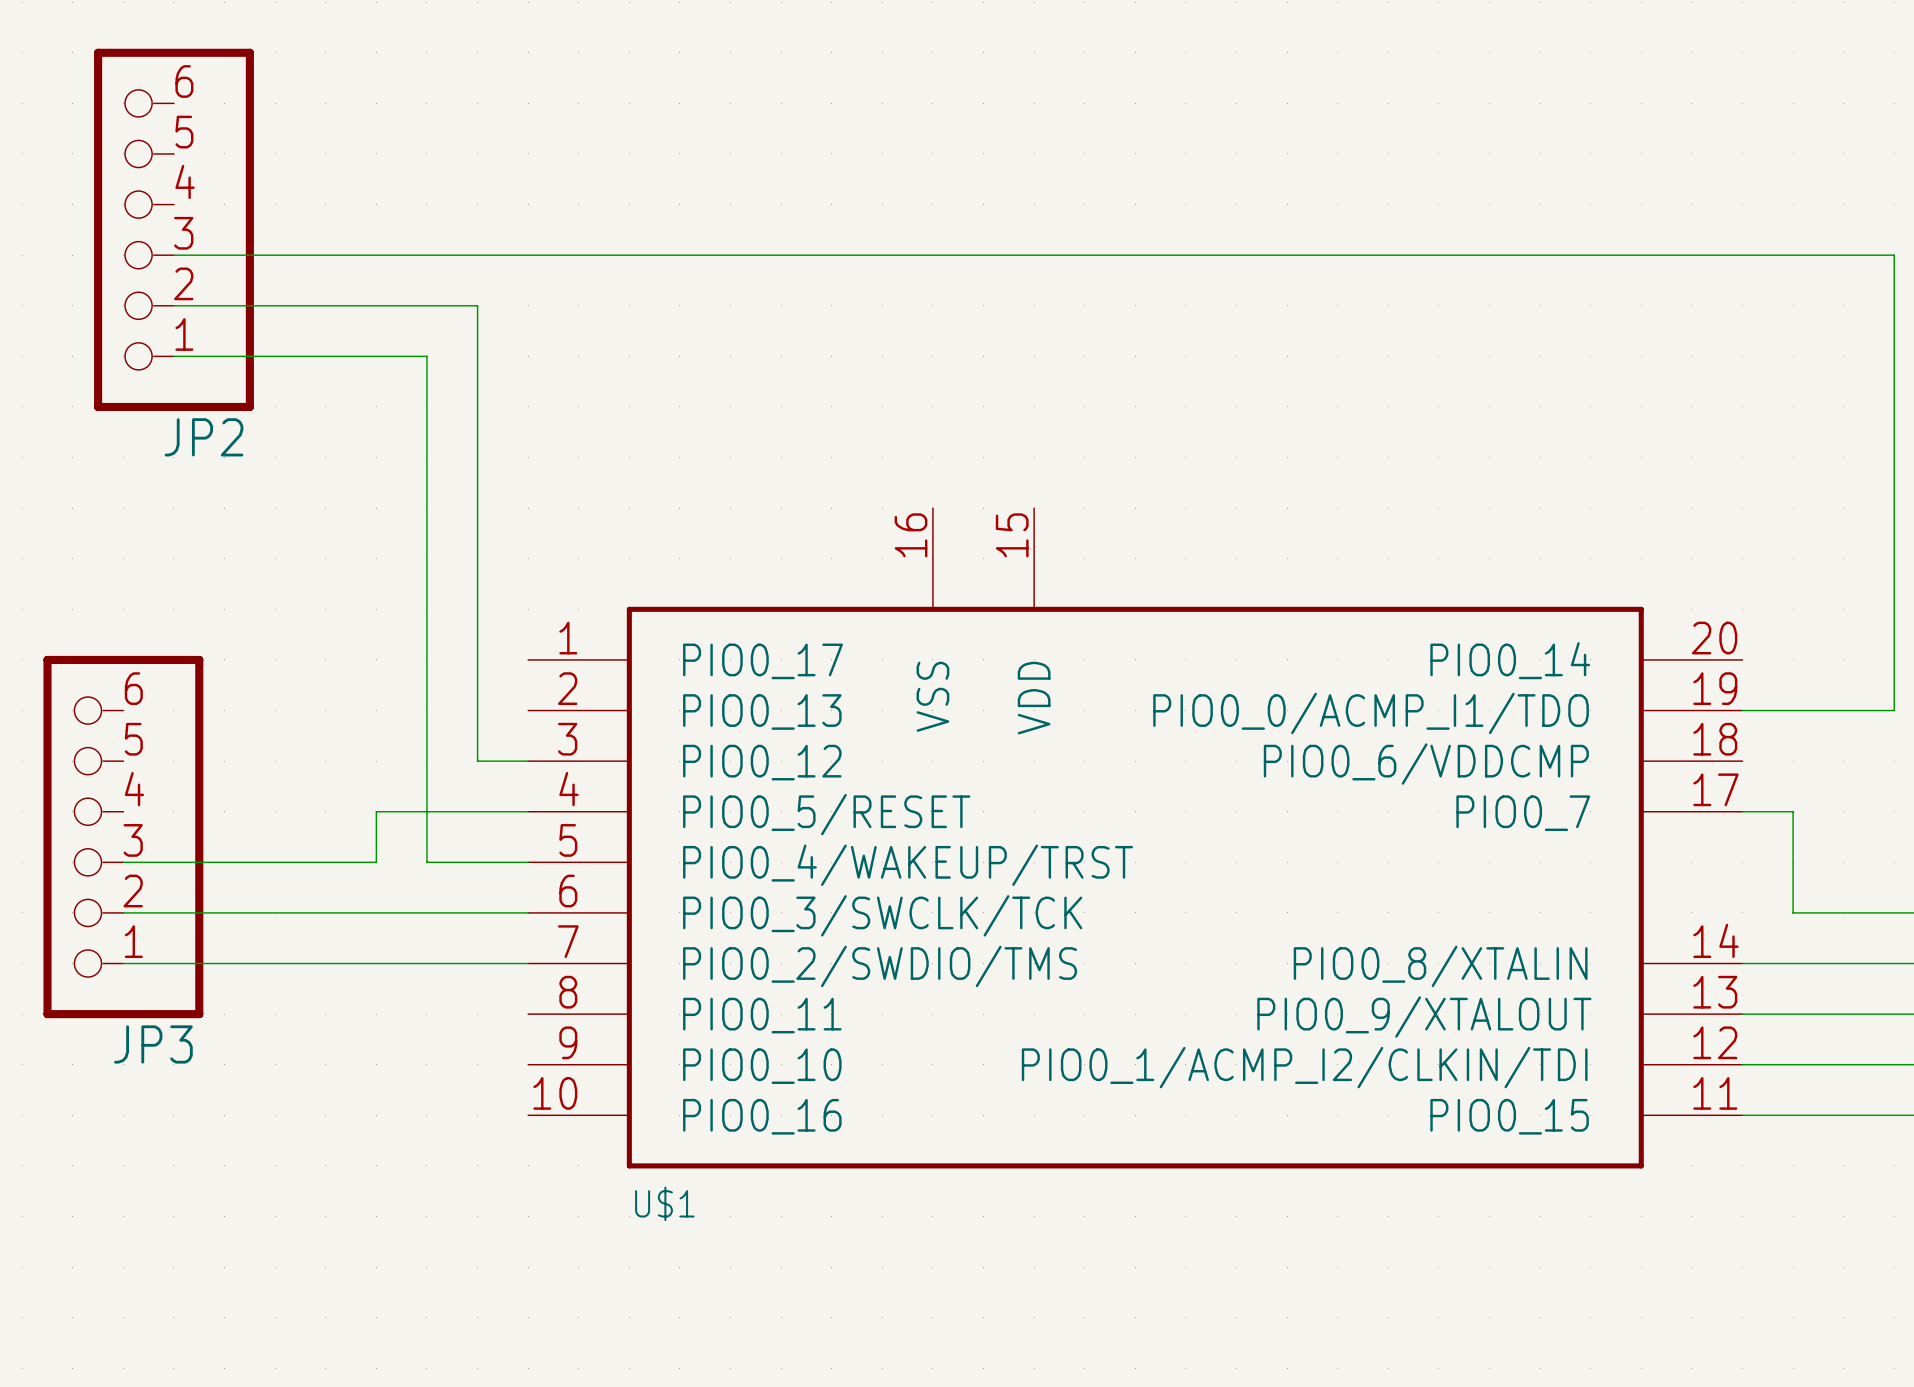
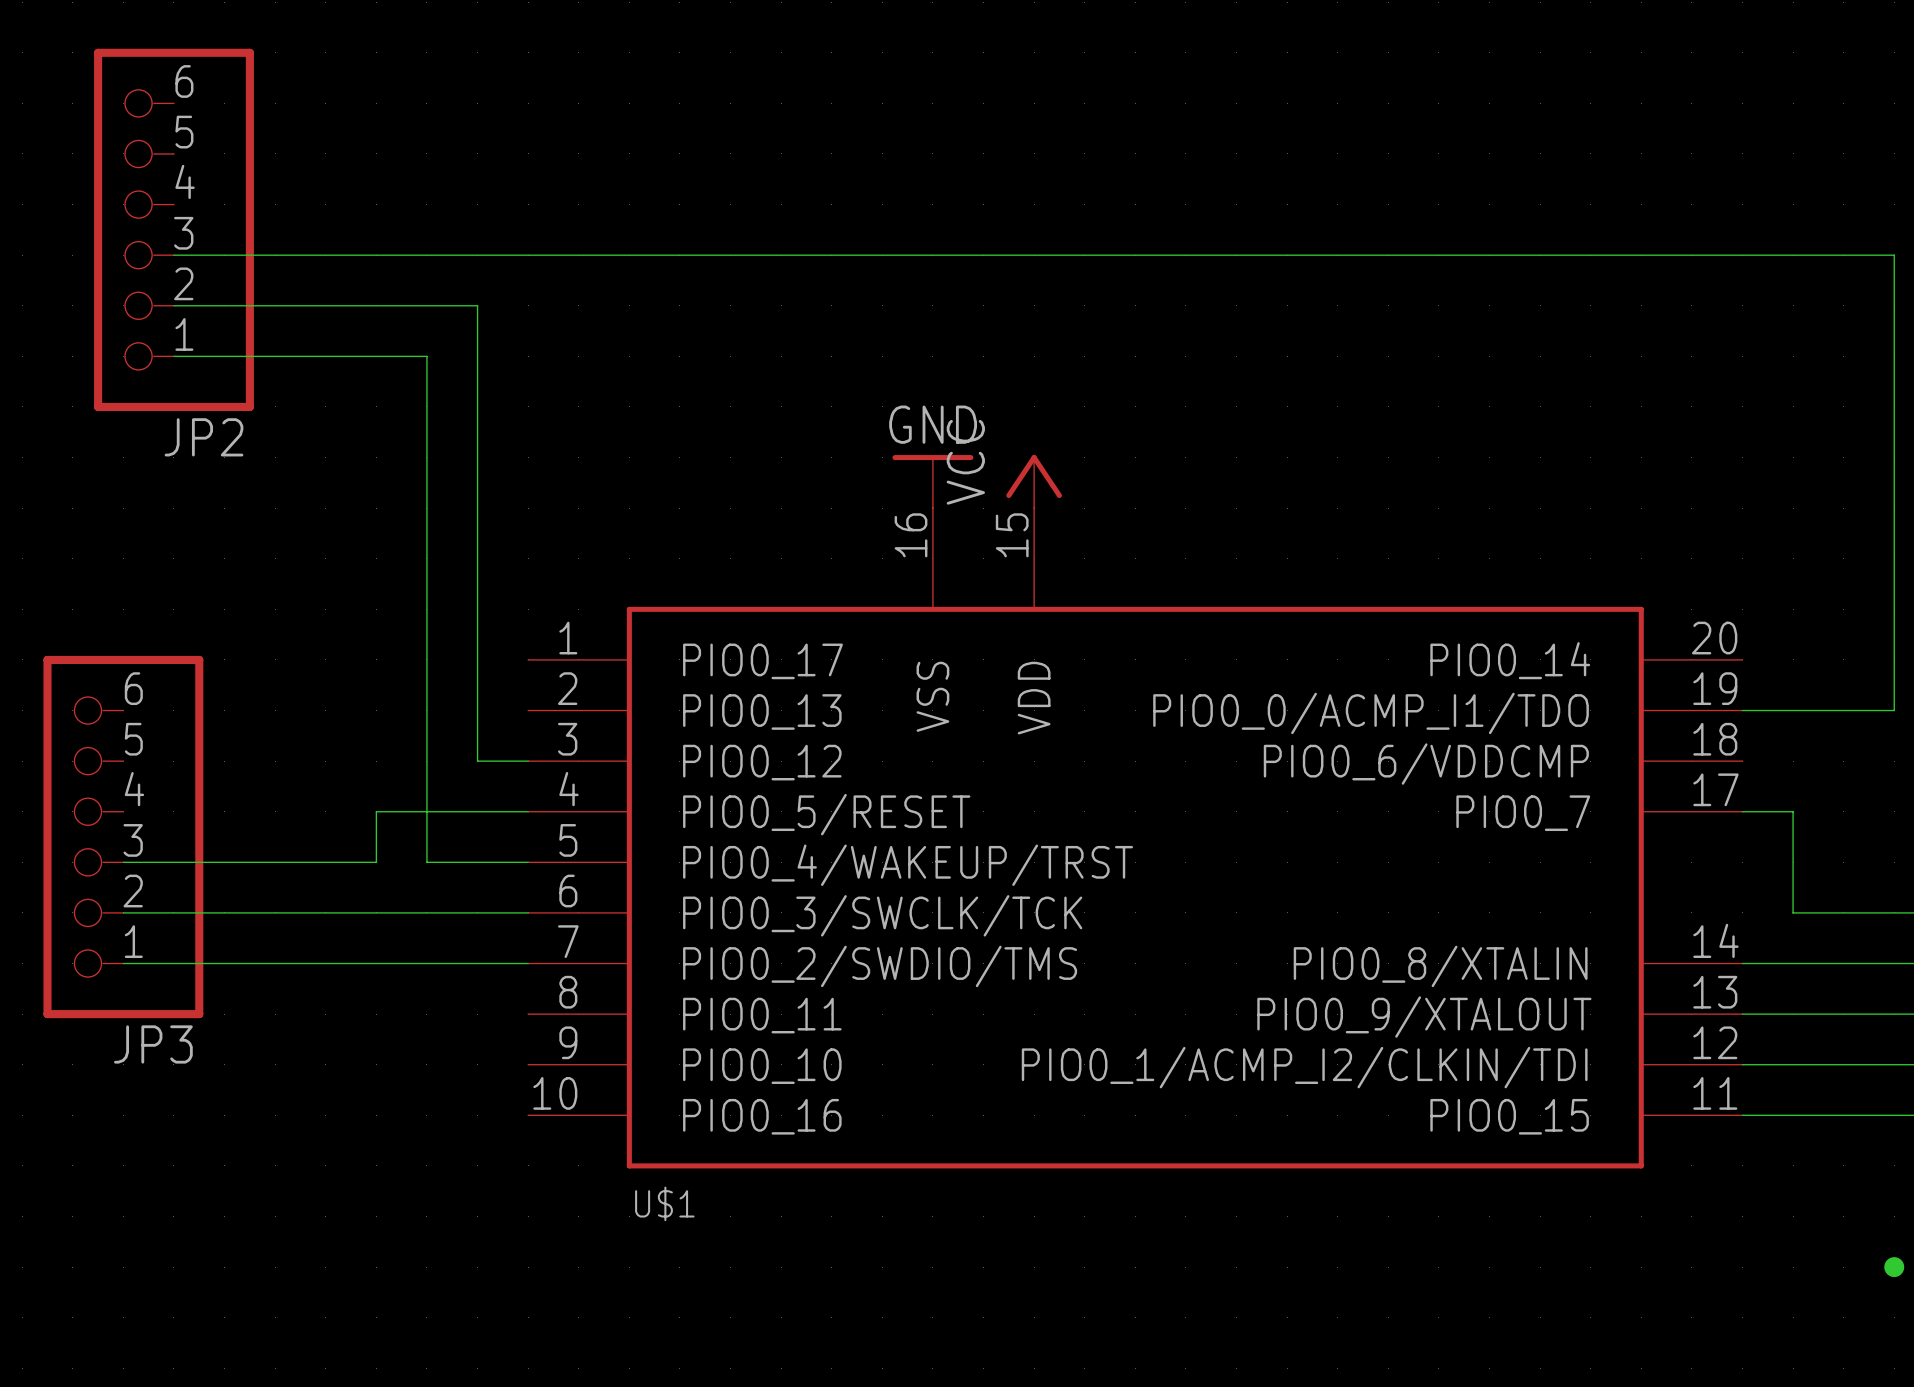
power symbol: none -> GND (932, 481)
power symbol: none -> VCC (1034, 481)
junction: none -> (1894, 1267)

